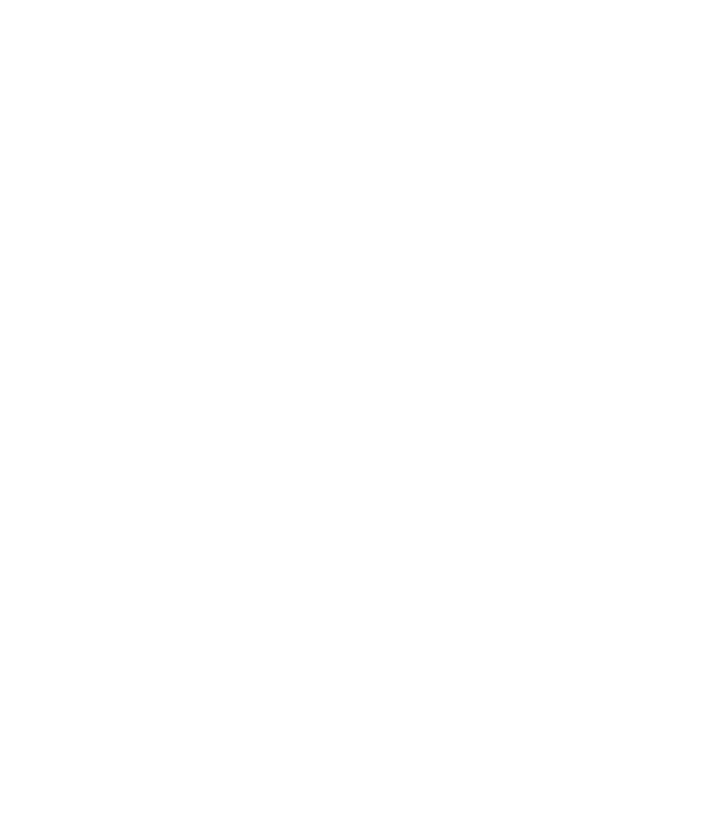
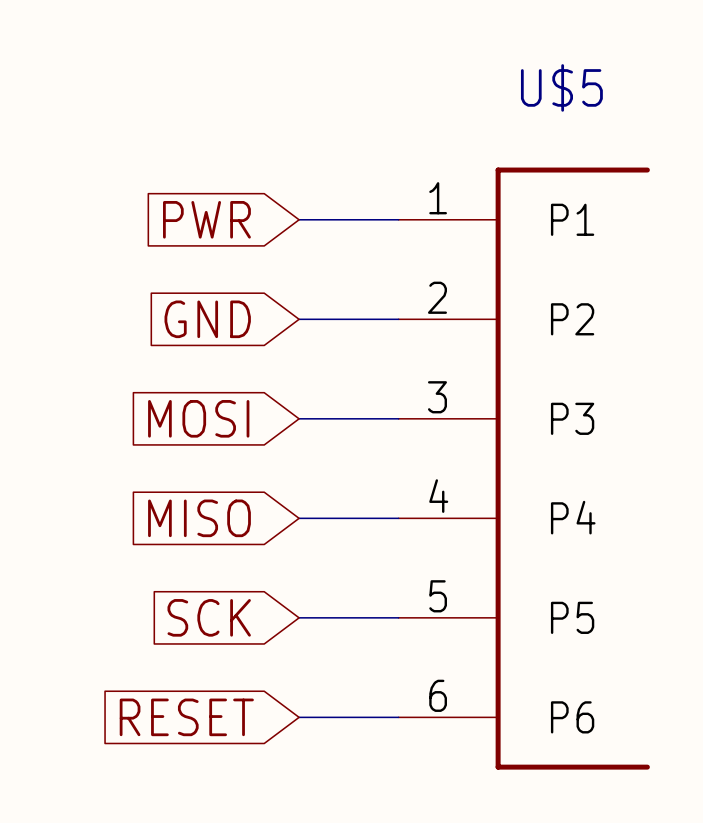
global label: none -> PWR (206, 219)
wire: none -> (299, 219) (398, 219)
global label: none -> GND (207, 319)
wire: none -> (299, 319) (398, 319)
global label: none -> MOSI (198, 418)
wire: none -> (299, 418) (398, 418)
U$5: none -> (524, 468)
global label: none -> MISO (199, 518)
wire: none -> (299, 518) (398, 518)
global label: none -> SCK (209, 617)
wire: none -> (299, 617) (398, 617)
global label: none -> RESET (186, 717)
wire: none -> (299, 717) (398, 717)

